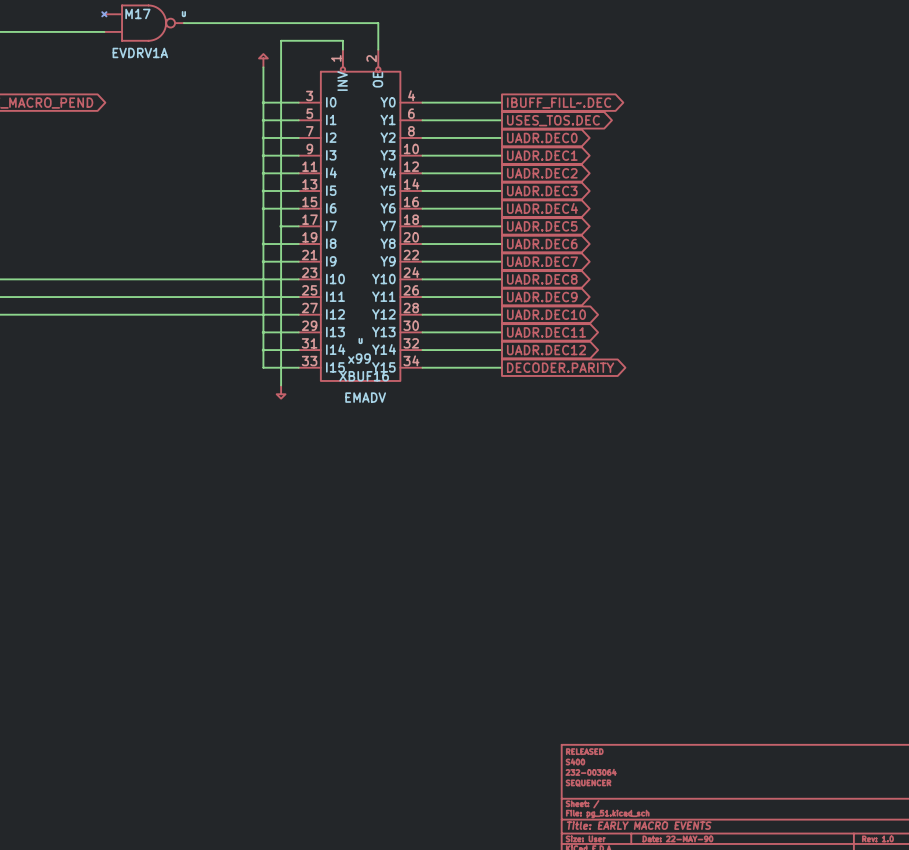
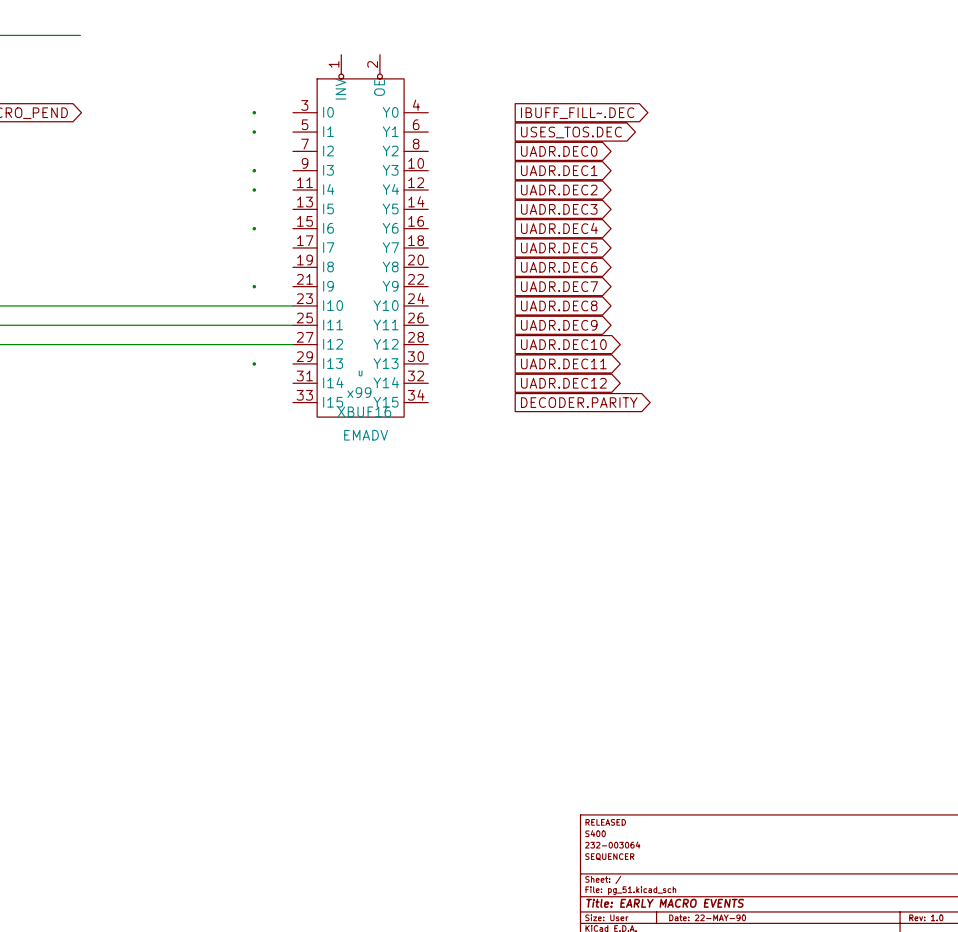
no-connect mark: (104, 14) -> none
part: (144, 23) -> none
wire: (183, 23) (378, 23) (378, 49) -> none
wire: (342, 49) (342, 40) (281, 40) (281, 385) -> none
power symbol: (263, 60) -> none
wire: (263, 67) (263, 367) (298, 367) -> none
wire: (263, 102) (298, 102) -> none
wire: (422, 102) (501, 102) -> none
wire: (263, 120) (298, 120) -> none
wire: (422, 120) (501, 120) -> none
wire: (263, 137) (298, 137) -> none
wire: (422, 137) (501, 137) -> none
wire: (263, 155) (298, 155) -> none
wire: (422, 155) (501, 155) -> none
wire: (263, 173) (298, 173) -> none
wire: (422, 173) (501, 173) -> none
wire: (263, 191) (298, 191) -> none
wire: (422, 191) (501, 191) -> none
wire: (263, 208) (298, 208) -> none
wire: (422, 208) (501, 208) -> none
wire: (281, 226) (298, 226) -> none
wire: (422, 226) (501, 226) -> none
wire: (263, 244) (298, 244) -> none
wire: (422, 244) (501, 244) -> none
wire: (263, 261) (298, 261) -> none
wire: (422, 261) (501, 261) -> none
wire: (422, 279) (501, 279) -> none
wire: (422, 297) (501, 297) -> none
wire: (422, 314) (501, 314) -> none
wire: (263, 332) (298, 332) -> none
wire: (422, 332) (501, 332) -> none
wire: (263, 350) (298, 350) -> none
wire: (422, 350) (501, 350) -> none
wire: (422, 367) (501, 367) -> none
power symbol: (281, 392) -> none

